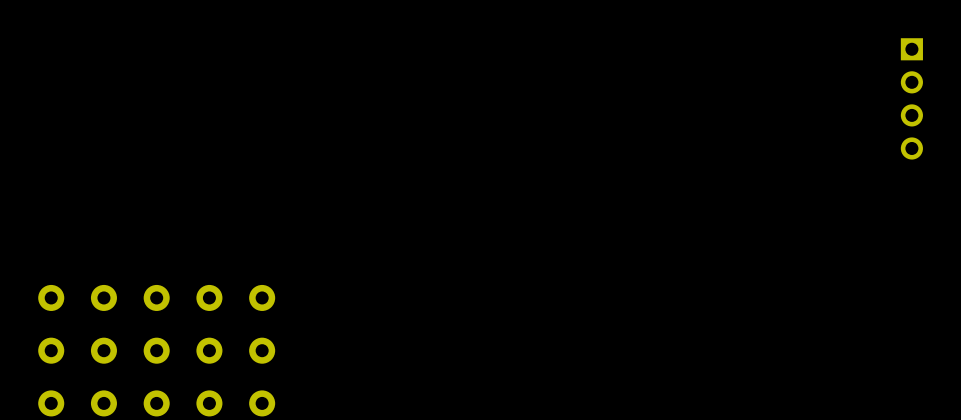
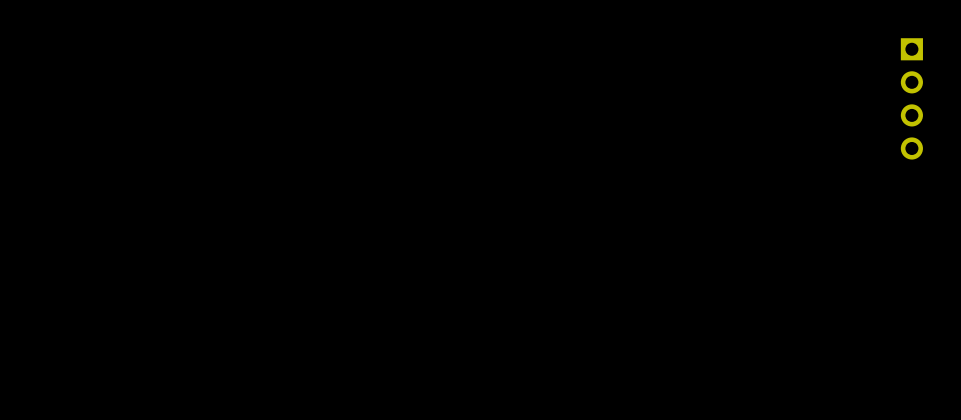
part: (51, 297) -> none
part: (103, 297) -> none
part: (156, 297) -> none
part: (209, 297) -> none
part: (262, 297) -> none
part: (51, 350) -> none
part: (103, 350) -> none
part: (156, 350) -> none
part: (209, 350) -> none
part: (262, 350) -> none
part: (51, 403) -> none
part: (103, 403) -> none
part: (156, 403) -> none
part: (209, 403) -> none
part: (262, 403) -> none

